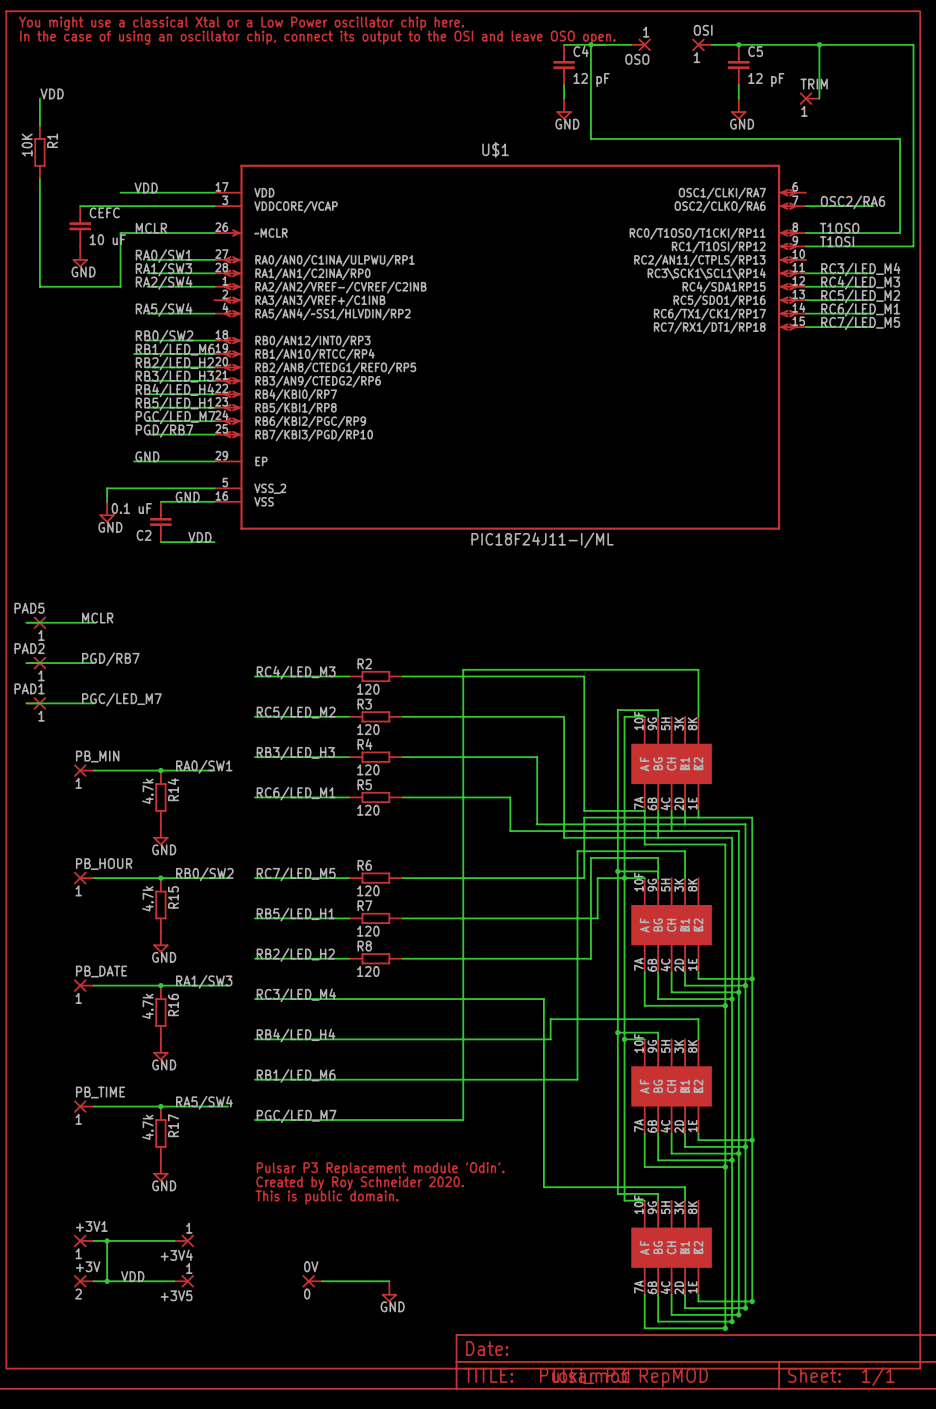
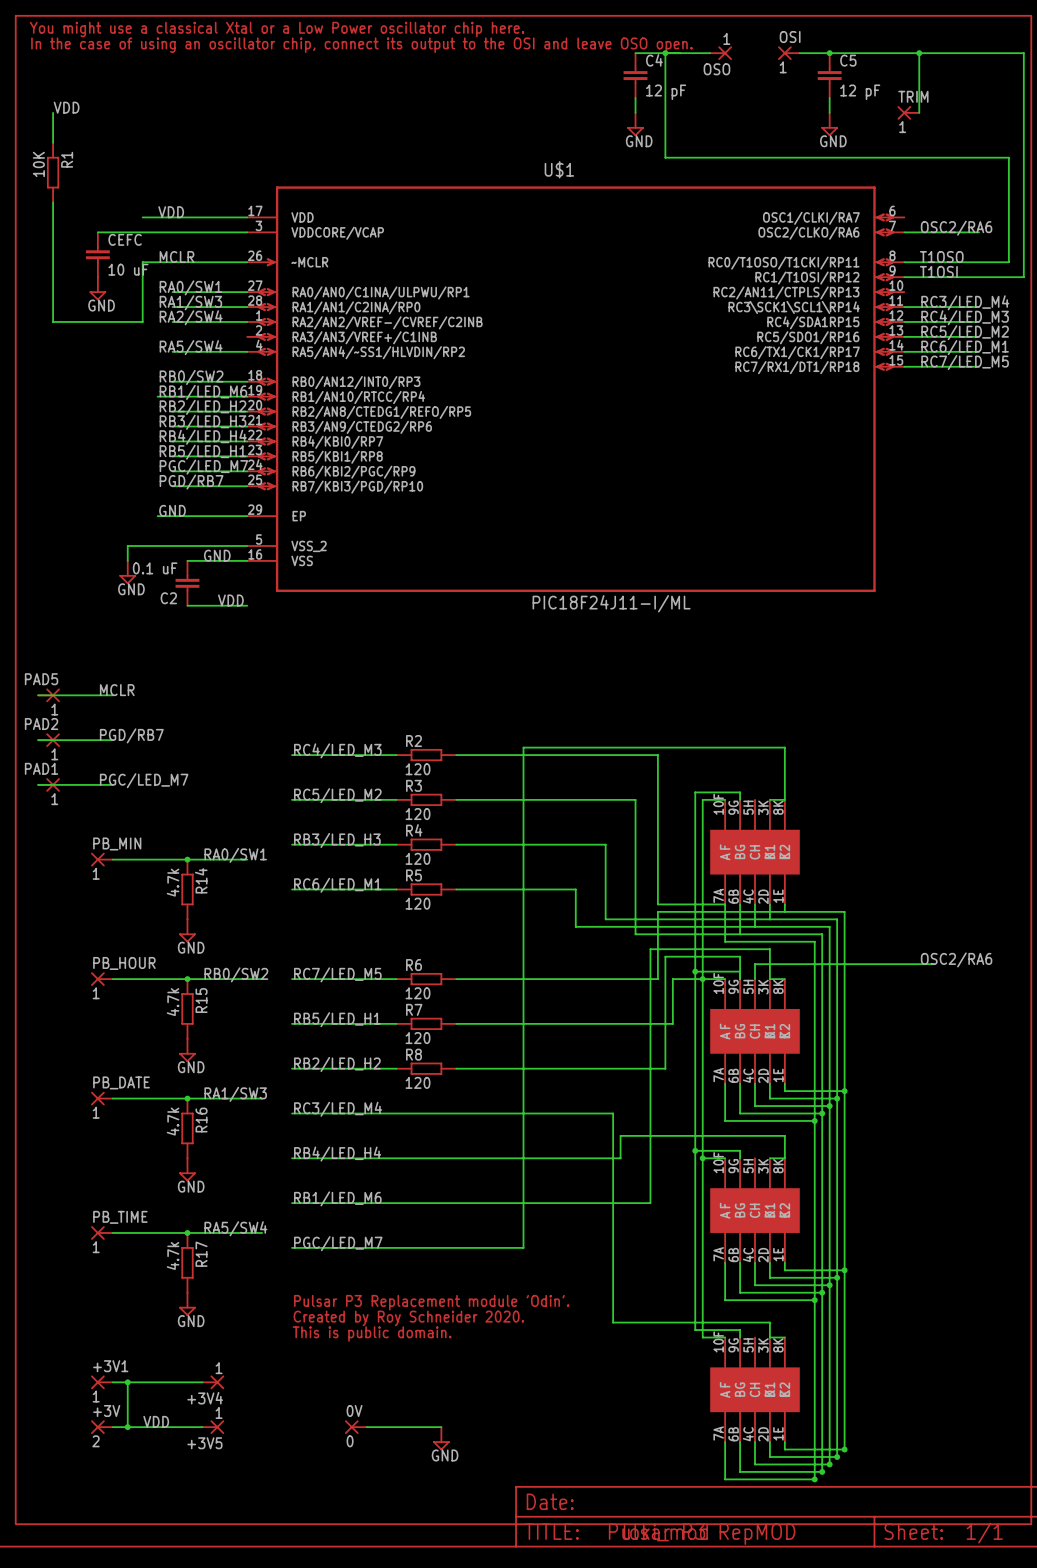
wire: none -> (769, 799) (784, 799)
label: none -> OSC2/RA6 (956, 959)
wire: none -> (934, 964) (755, 964) (755, 979)
wire: none -> (769, 979) (784, 979)
wire: none -> (769, 1158) (784, 1158)
wire: none -> (769, 1337) (784, 1337)

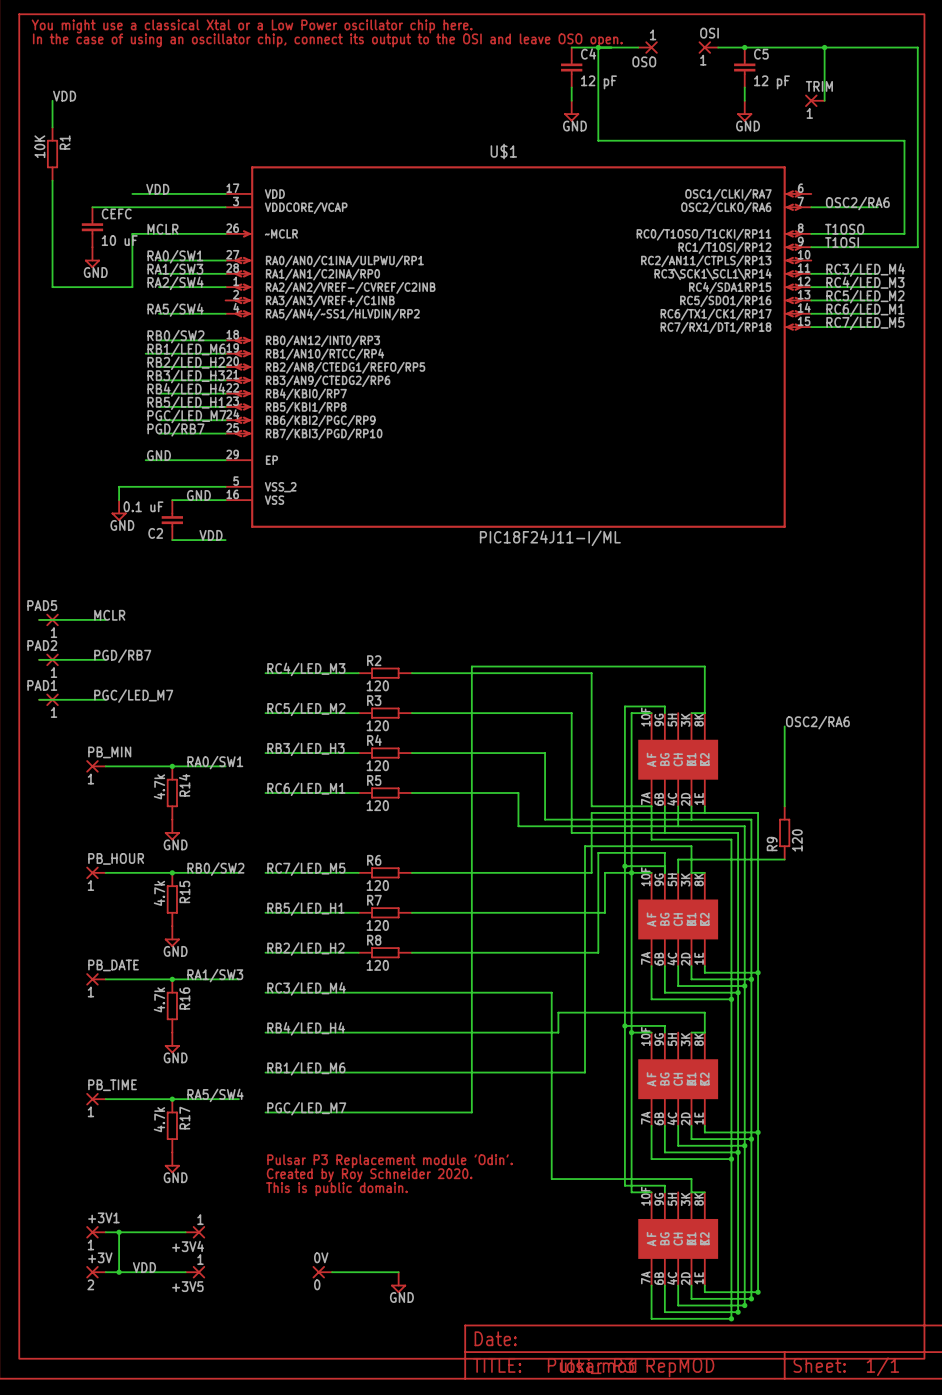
label: none -> OSC2/RA6 (817, 722)
wire: none -> (784, 726) (784, 806)
R9: none -> 120 (784, 832)
label: OSC2/RA6 (956, 959) -> none
wire: (874, 964) (934, 964) -> none

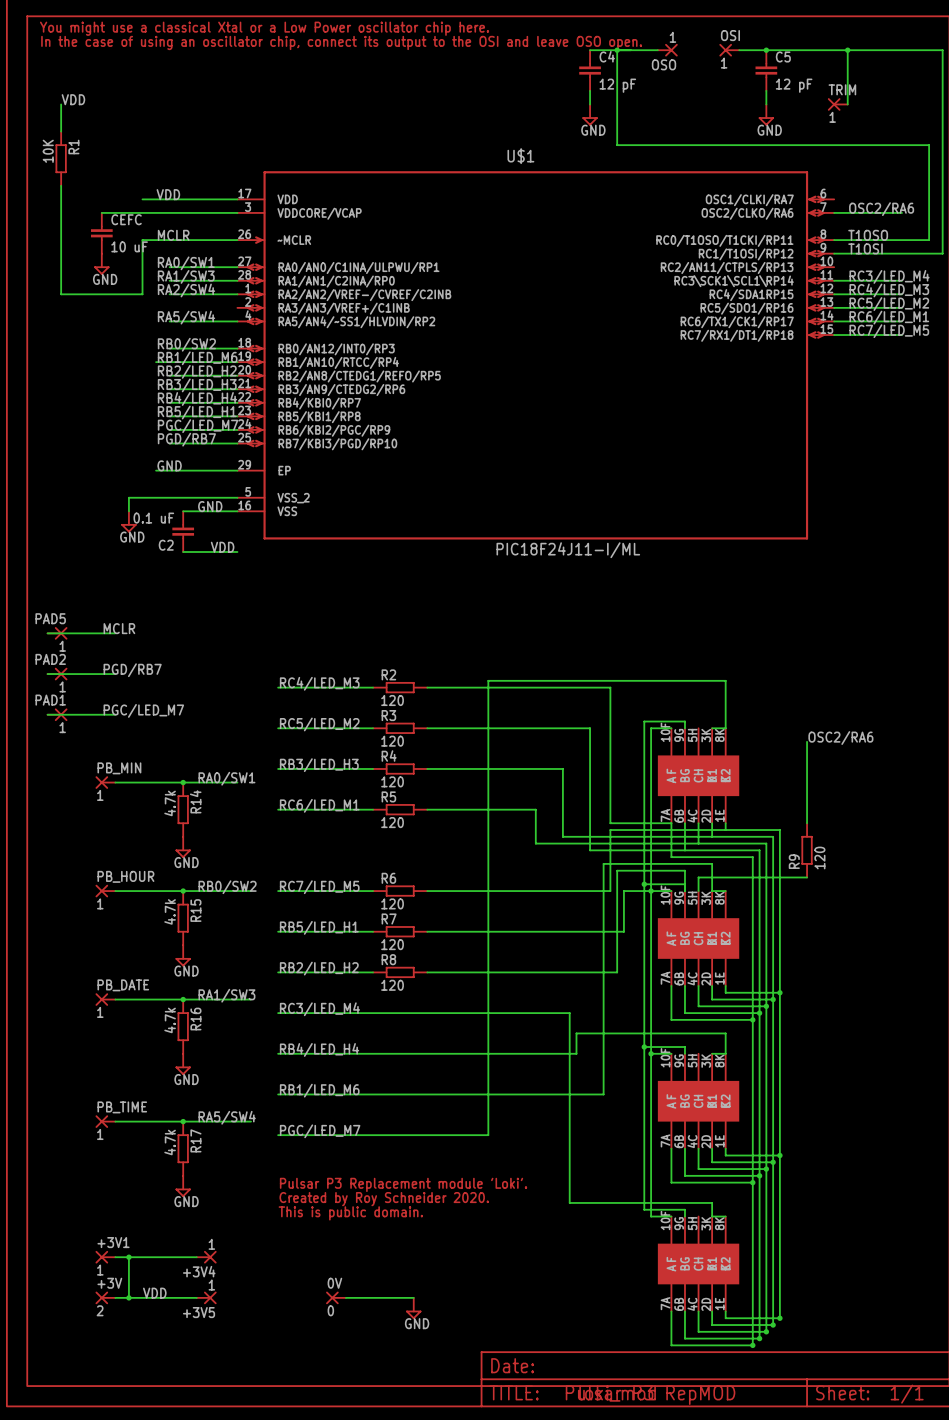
text: Pulsar P3 Replacement module 'Odin'. (390, 1161) -> Pulsar P3 Replacement module 'Loki'. (403, 1184)

